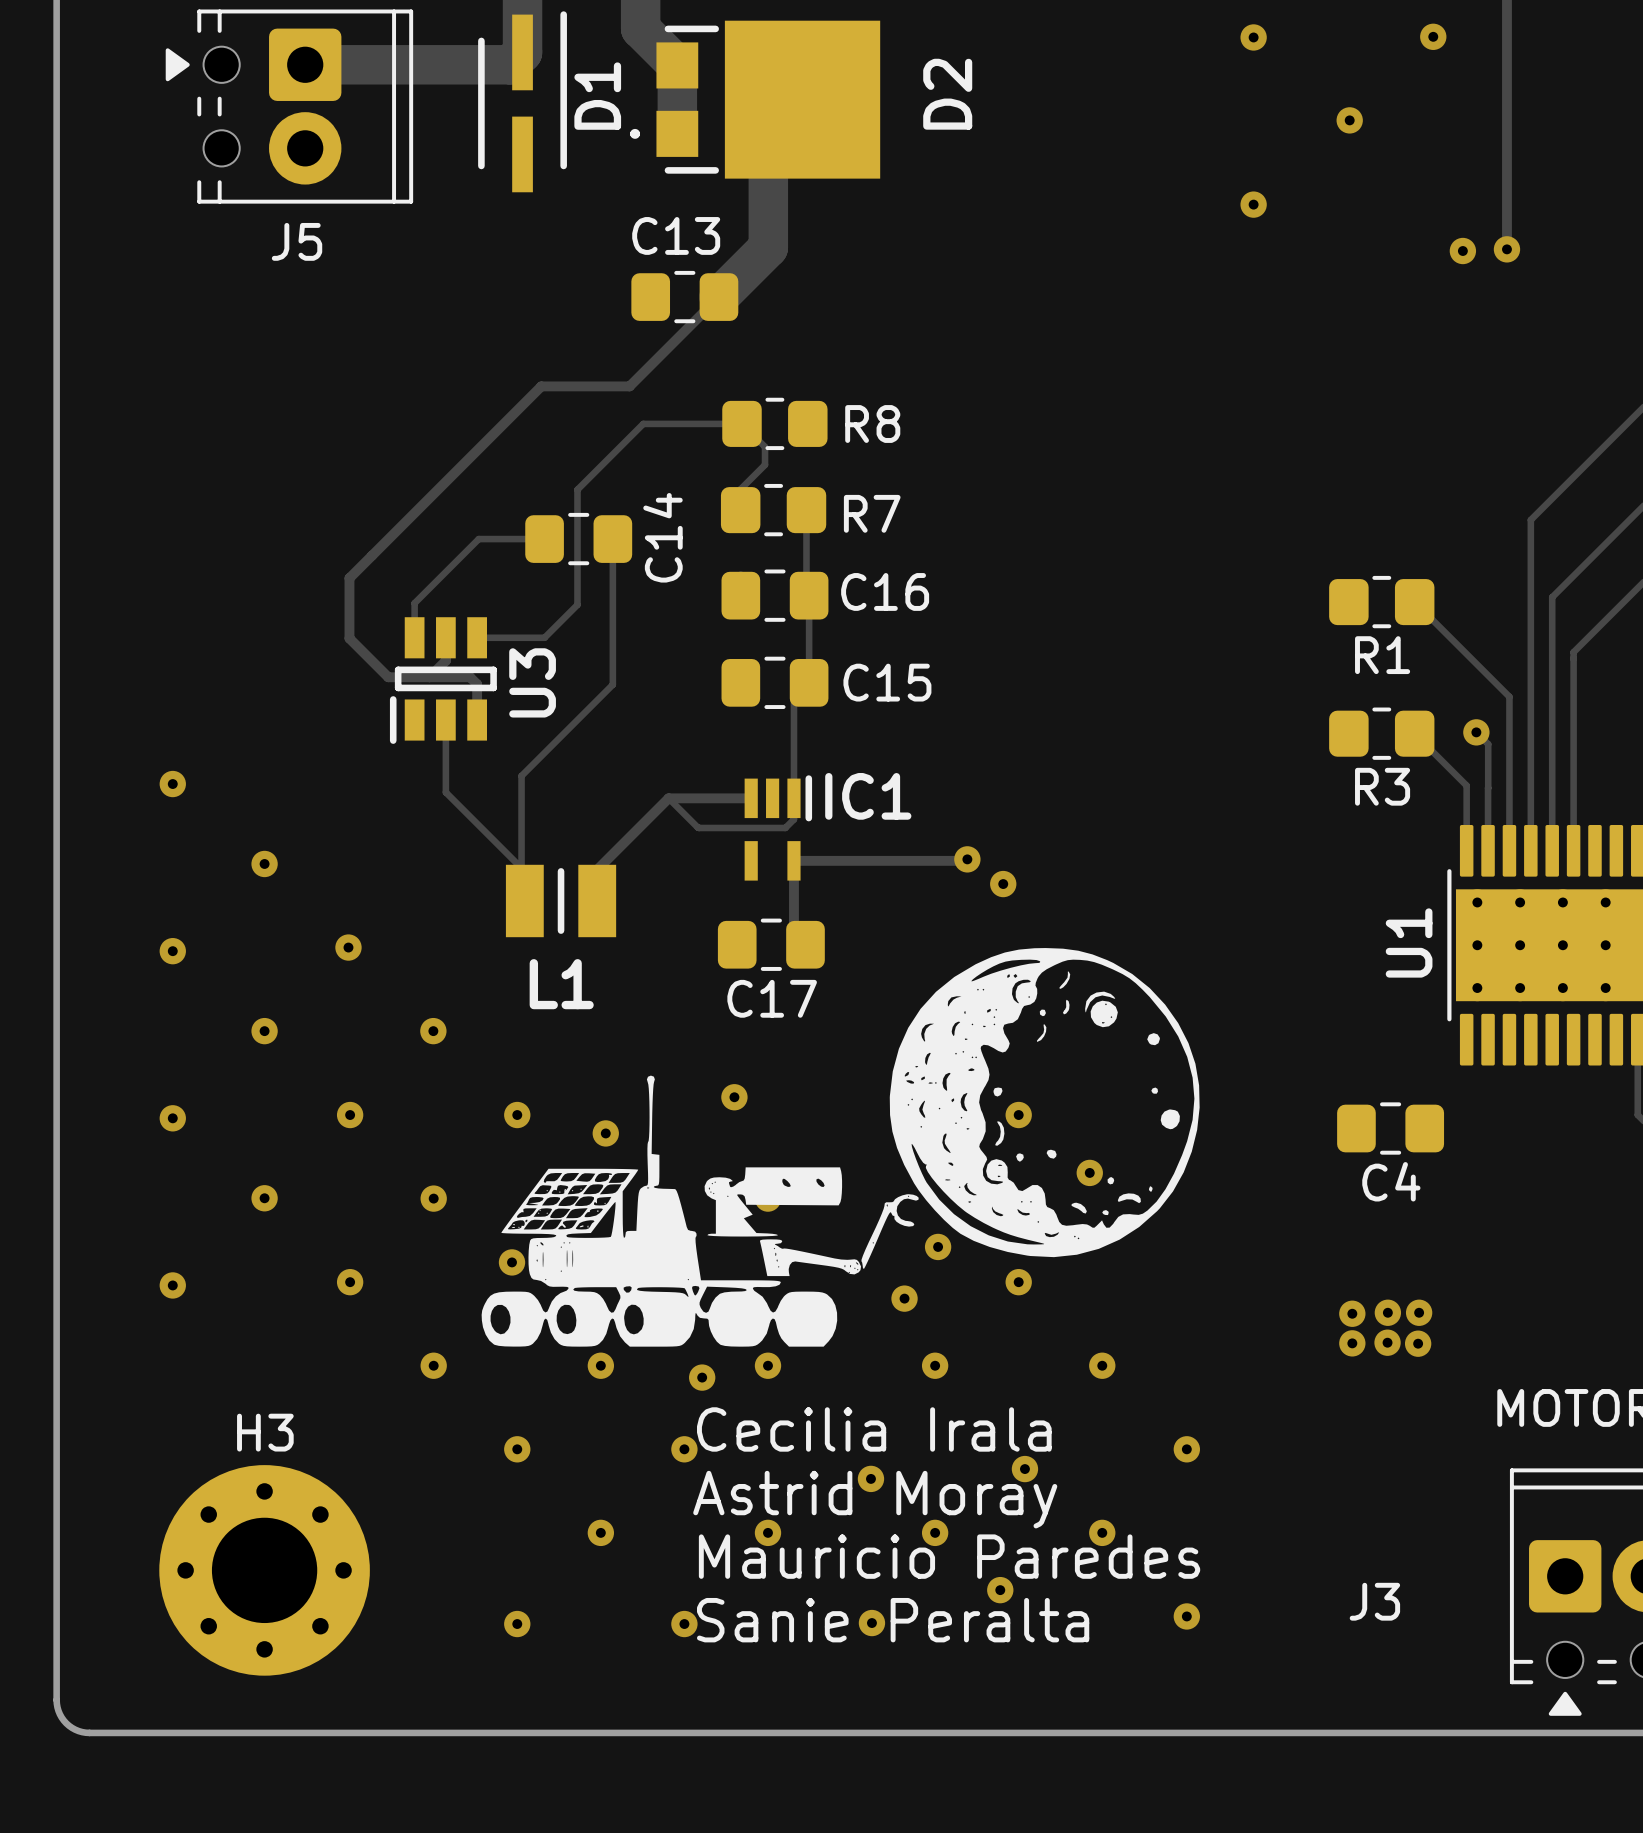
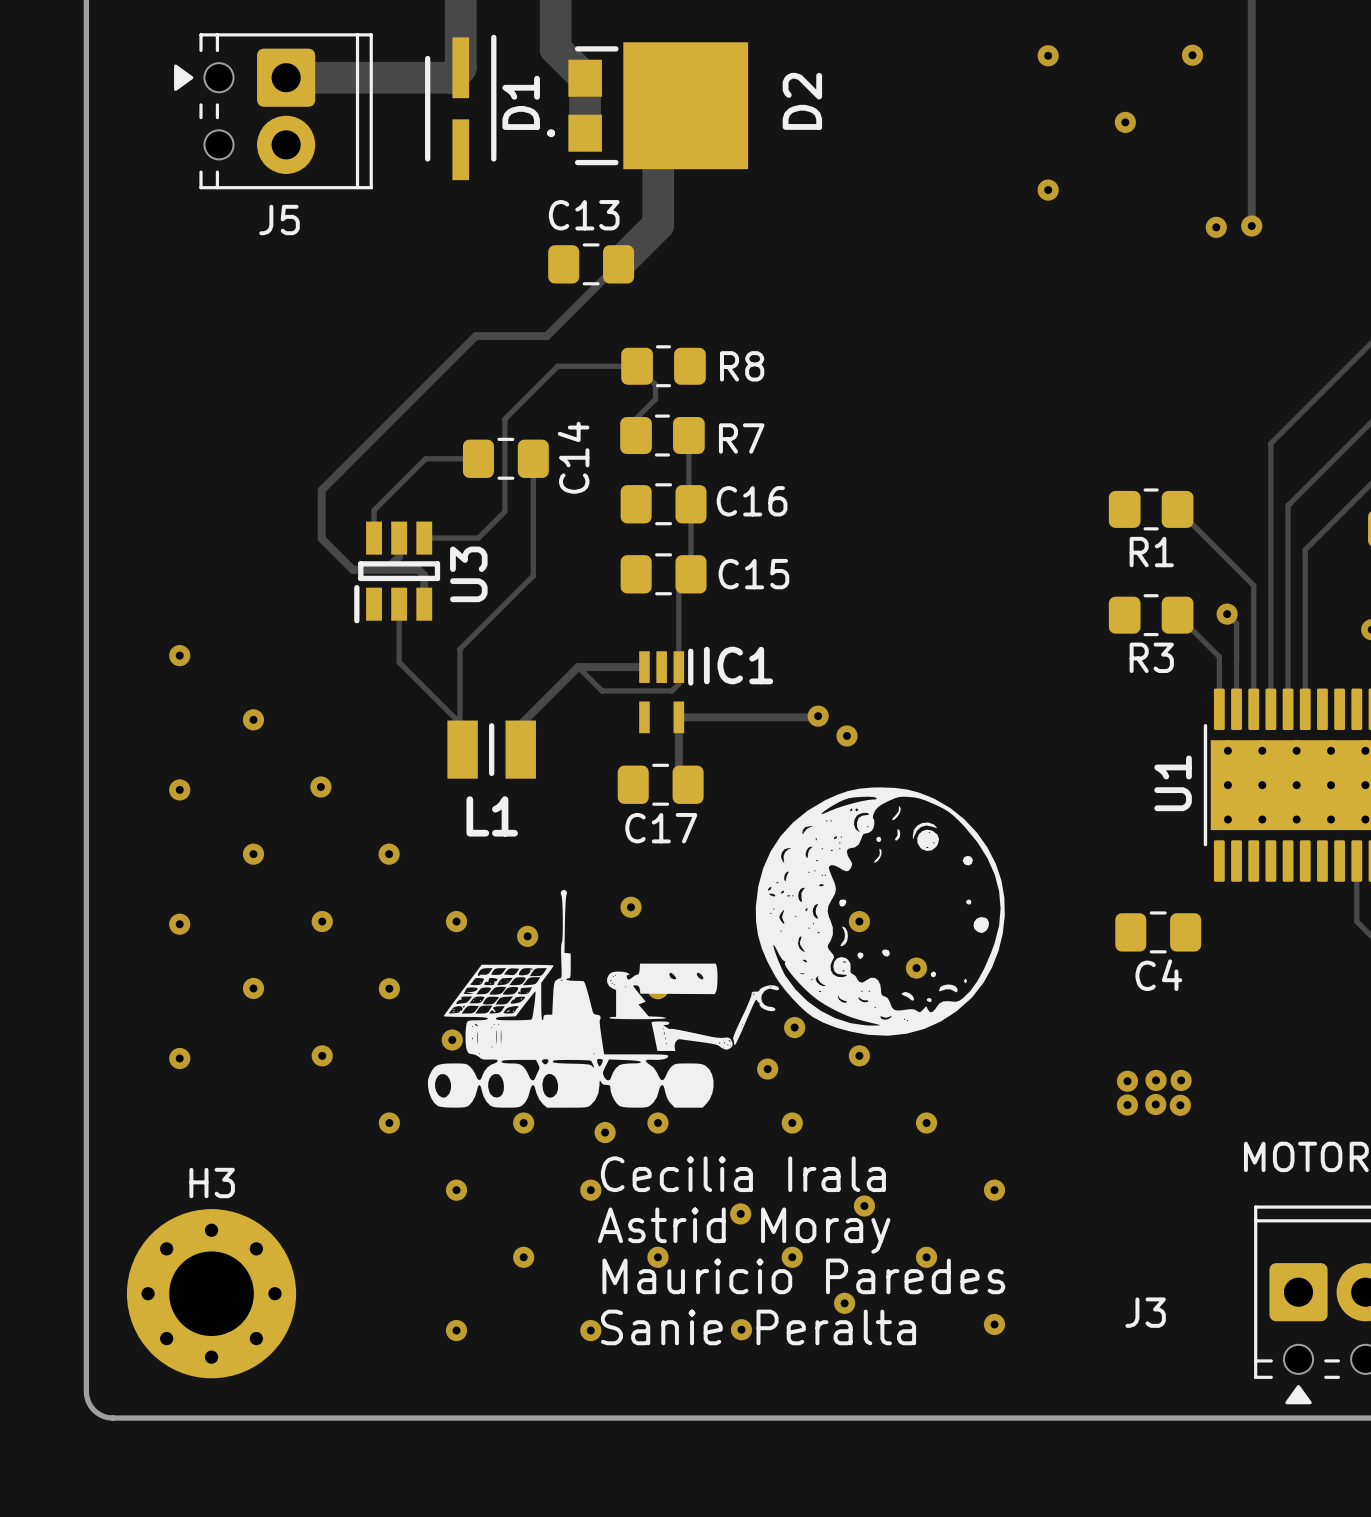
H3 position: (264, 1570) -> (211, 1293)

